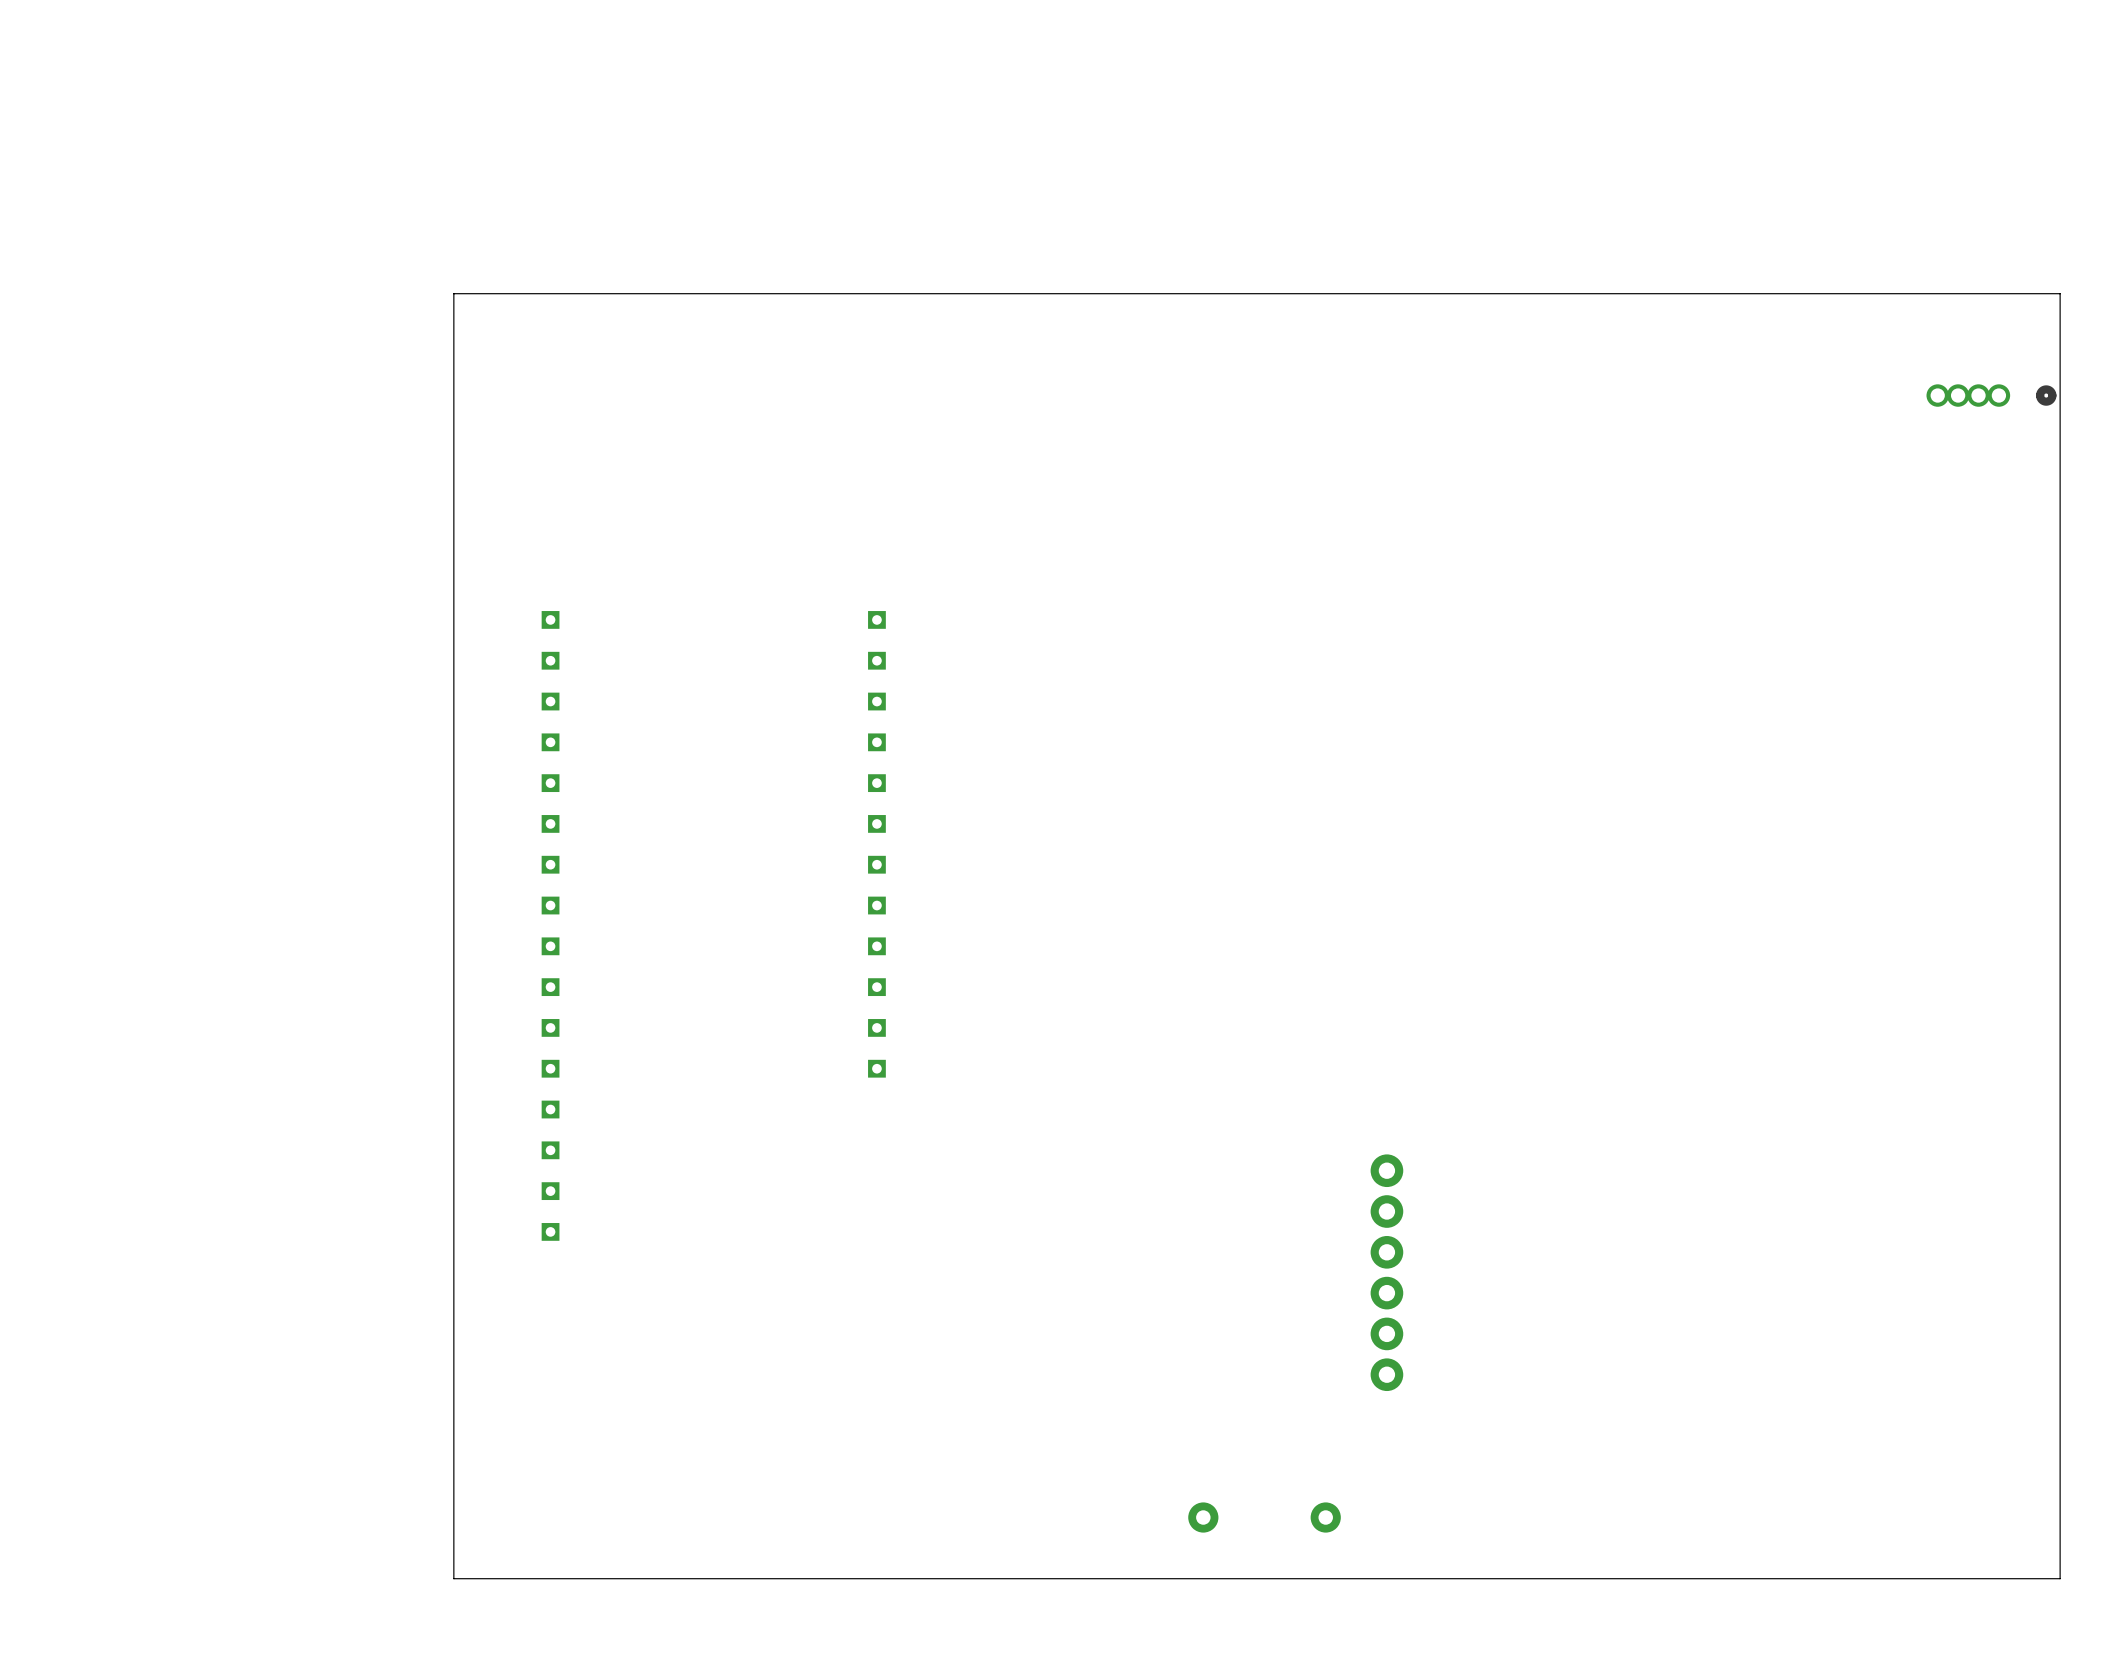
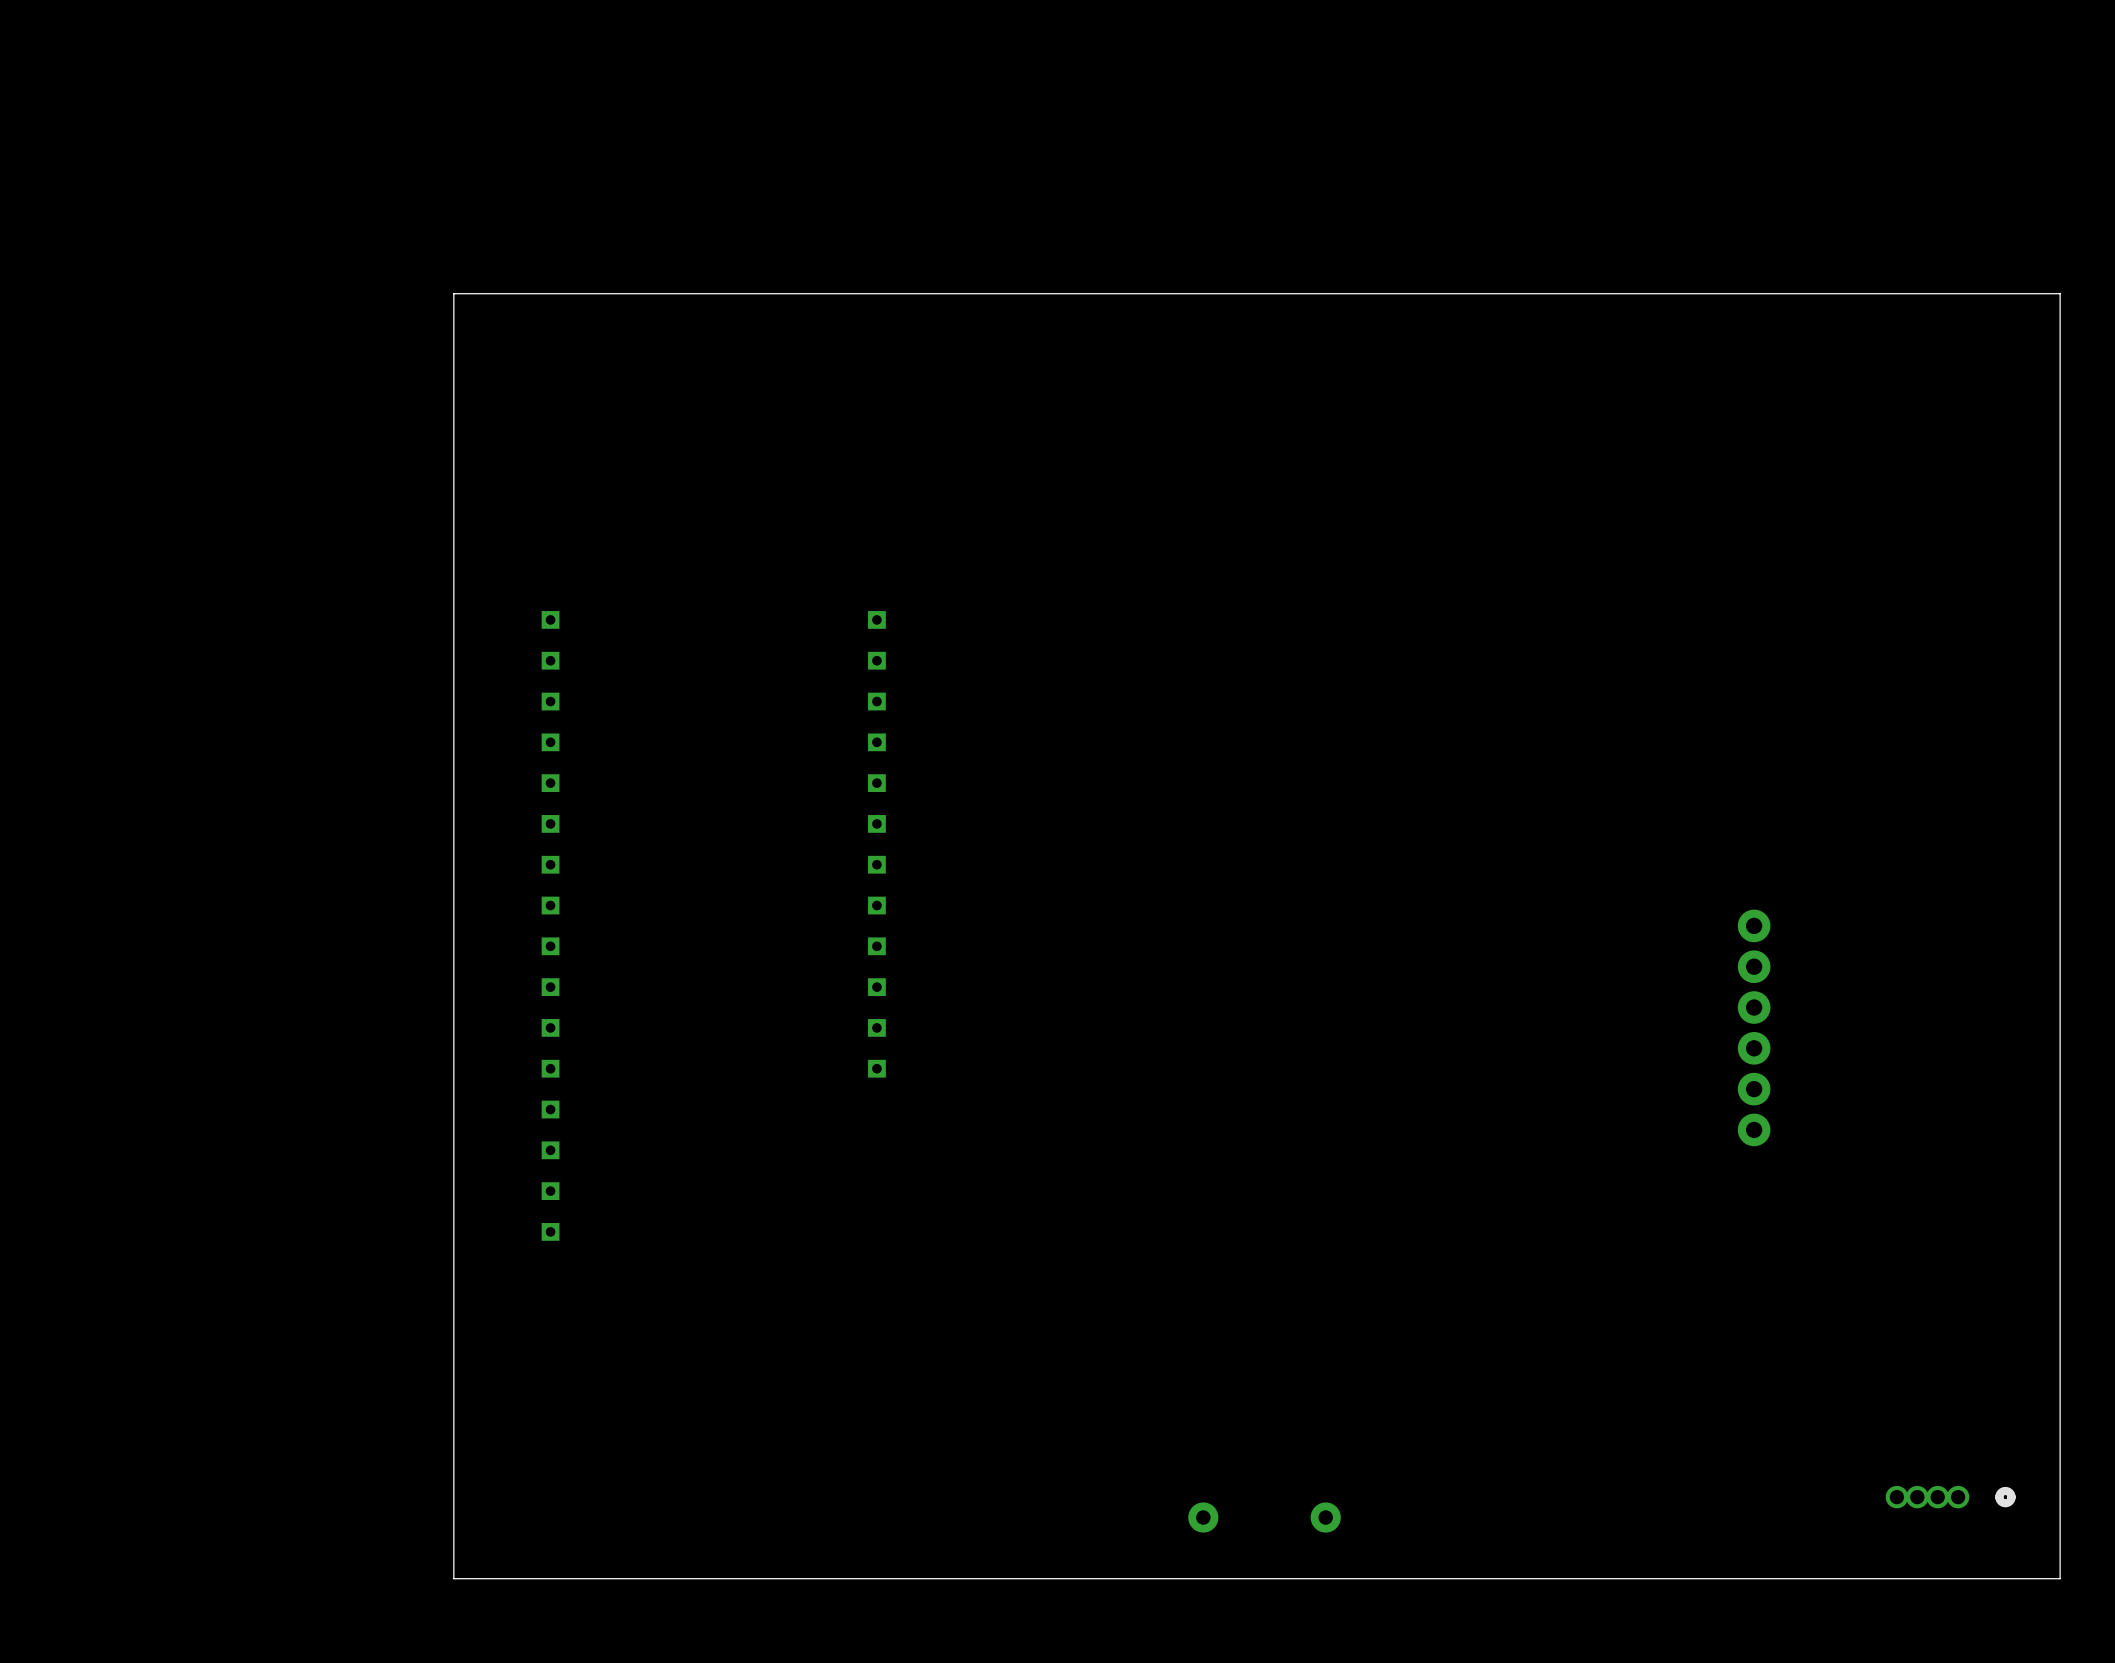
part: (1991, 395) -> none
part: none -> (1754, 1027)
part: (1386, 1272) -> none
part: none -> (1950, 1497)

